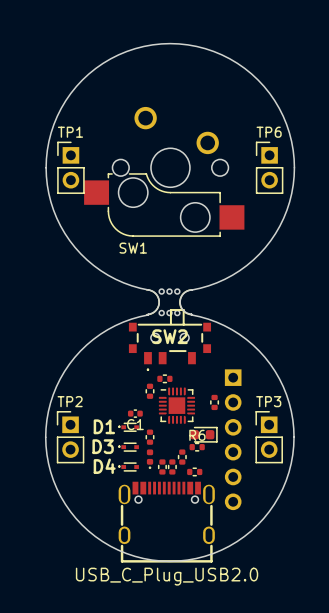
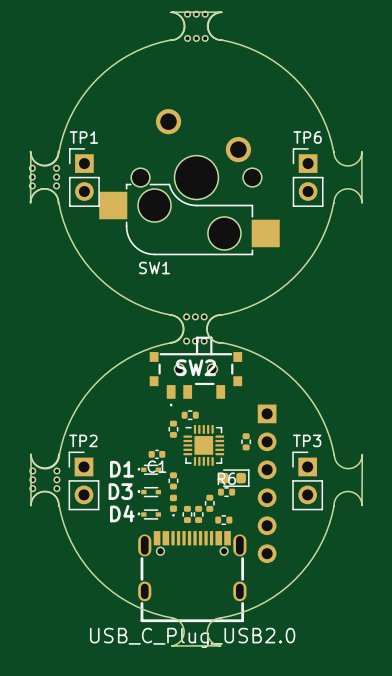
part: none -> (196, 26)
board edge: none -> (58, 151) (55, 161) (44, 165) (35, 162) (30, 151) (30, 202) (32, 196) (38, 190) (46, 188) (52, 191) (57, 198) (63, 221) (70, 238) (85, 262) (97, 276) (119, 294) (136, 303) (176, 317) (183, 327) (182, 334) (177, 340) (135, 354) (111, 369) (97, 381) (80, 403) (70, 419) (63, 436) (58, 460) (53, 465) (45, 468) (38, 466) (32, 461) (31, 454) (31, 505) (33, 497) (40, 492) (48, 492) (55, 496) (71, 541) (91, 572) (112, 591) (128, 602) (145, 610) (178, 620) (183, 626) (183, 635) (179, 641) (171, 645) (220, 645) (213, 643) (209, 638) (207, 629) (210, 623) (215, 619) (256, 606) (280, 591) (294, 579) (312, 557) (322, 541) (329, 524) (334, 501) (338, 495) (346, 491) (352, 492) (359, 497) (361, 505) (362, 454) (358, 463) (348, 468) (337, 463) (334, 454)
board edge: none -> (58, 151) (63, 133) (74, 108) (97, 78) (119, 61) (135, 51) (152, 44) (175, 39) (181, 34) (184, 28) (183, 20) (179, 15) (172, 12) (221, 12) (214, 14) (209, 19) (207, 25) (210, 34) (217, 39) (240, 44) (257, 51) (273, 61) (295, 78) (317, 108) (325, 125) (333, 151)
board edge: none -> (333, 151) (338, 161) (347, 165) (357, 161) (361, 151) (361, 202) (359, 194) (354, 190) (347, 188) (339, 191) (334, 198) (328, 221) (321, 238) (312, 255) (294, 276) (280, 289) (256, 303) (238, 310) (213, 316) (209, 321) (206, 328) (209, 336) (214, 341) (240, 347) (257, 354) (274, 363) (295, 381) (318, 411) (326, 427) (334, 454)
part: none -> (44, 177)
board edge: (46, 167) (47, 185) (53, 210) (60, 226) (75, 247) (93, 265) (108, 275) (123, 282) (154, 292) (159, 302) (156, 309) (152, 313) (115, 325) (93, 339) (74, 357) (60, 378) (50, 402) (45, 437) (48, 463) (56, 488) (65, 504) (82, 524) (102, 541) (126, 553) (152, 560) (178, 561) (196, 558) (221, 550) (244, 536) (257, 524) (278, 496) (291, 463) (293, 446) (292, 419) (283, 386) (275, 371) (259, 350) (246, 339) (224, 325) (185, 312) (181, 307) (180, 300) (186, 291) (216, 282) (246, 265) (265, 247) (279, 226) (291, 193) (294, 167) (291, 141) (283, 116) (264, 86) (251, 73) (229, 58) (213, 51) (187, 44) (161, 43) (143, 46) (110, 58) (88, 73) (76, 86) (65, 100) (53, 124) (48, 141) (46, 167) -> none
part: none -> (44, 479)

